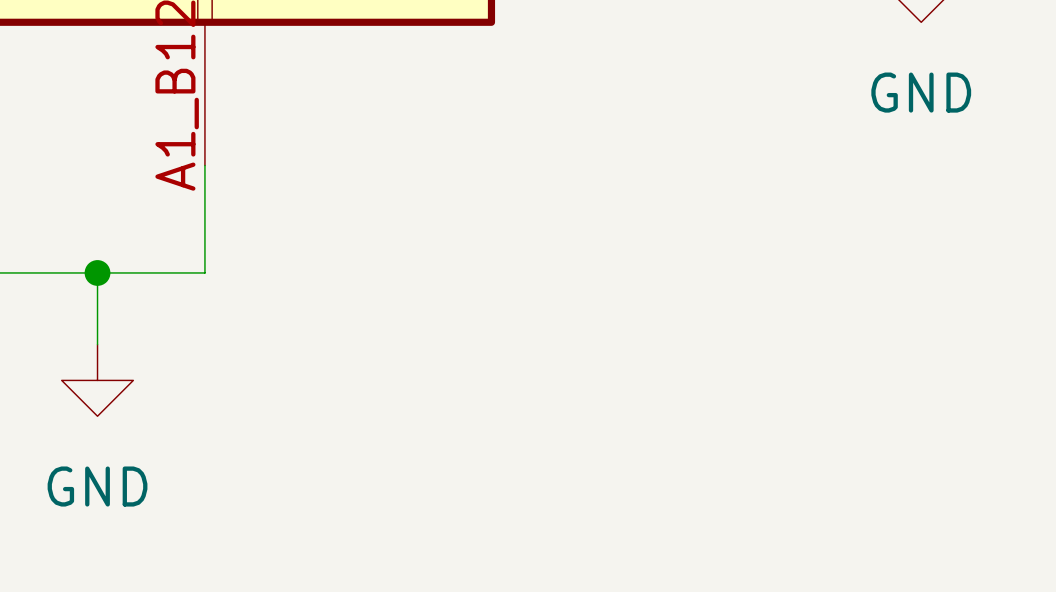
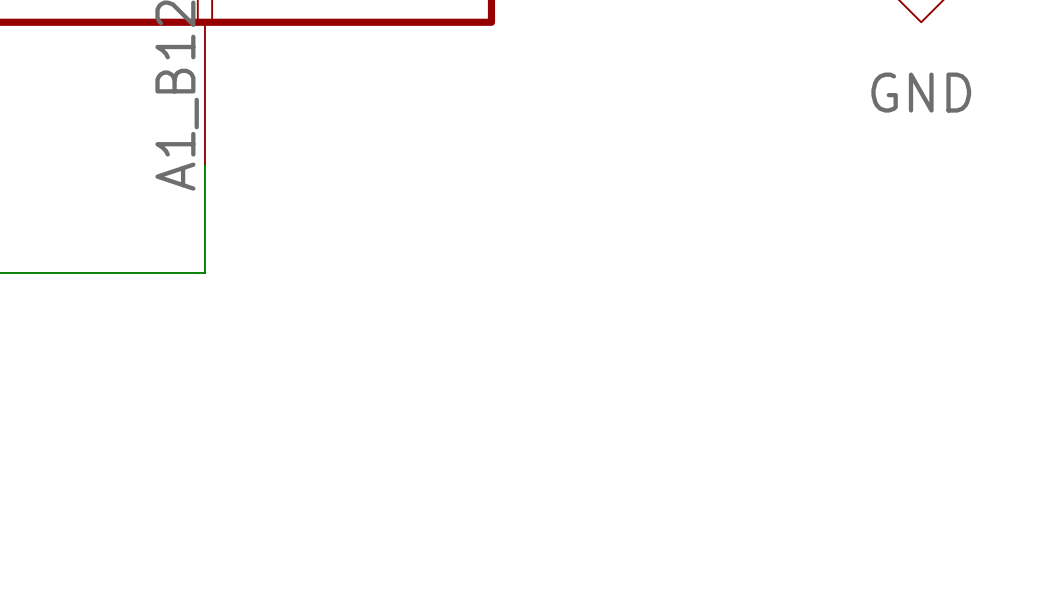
wire: (97, 272) (97, 344) -> none
junction: (97, 272) -> none
power symbol: GND (97, 380) -> none

